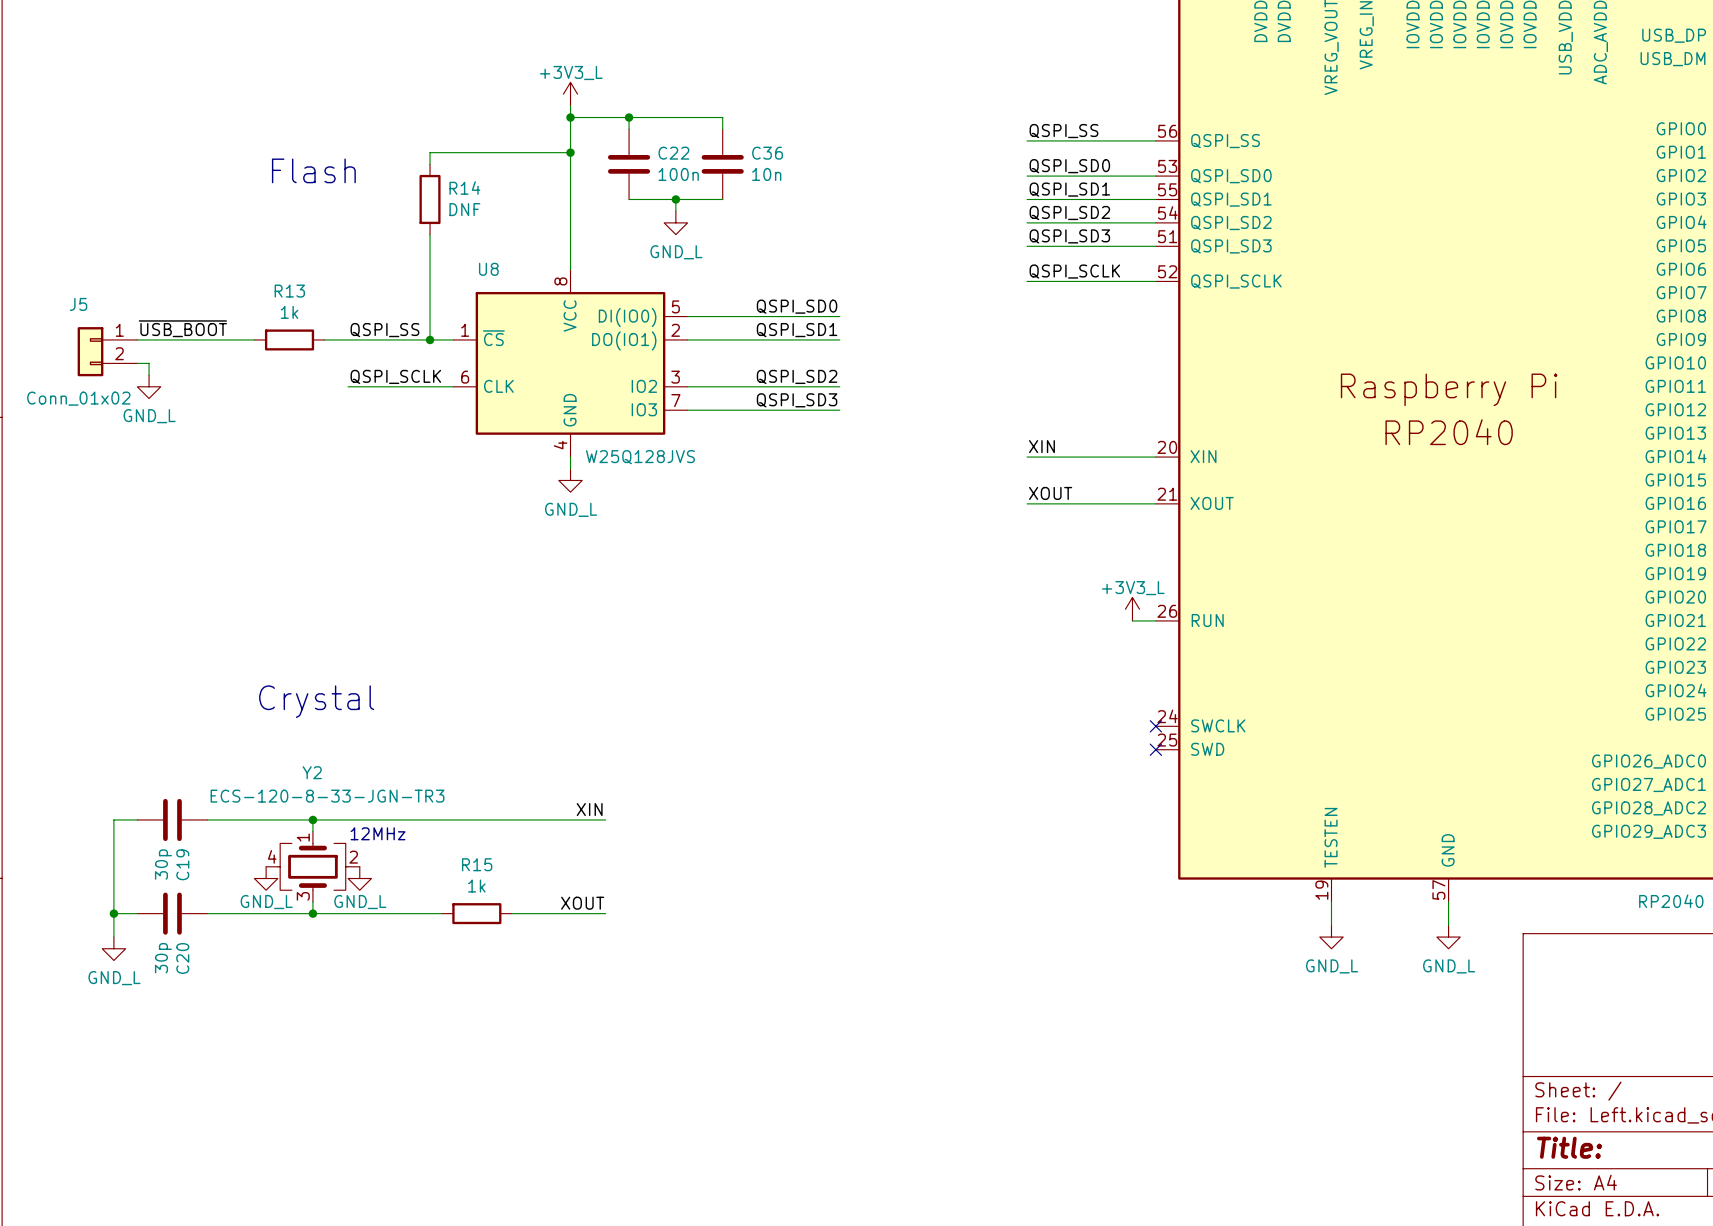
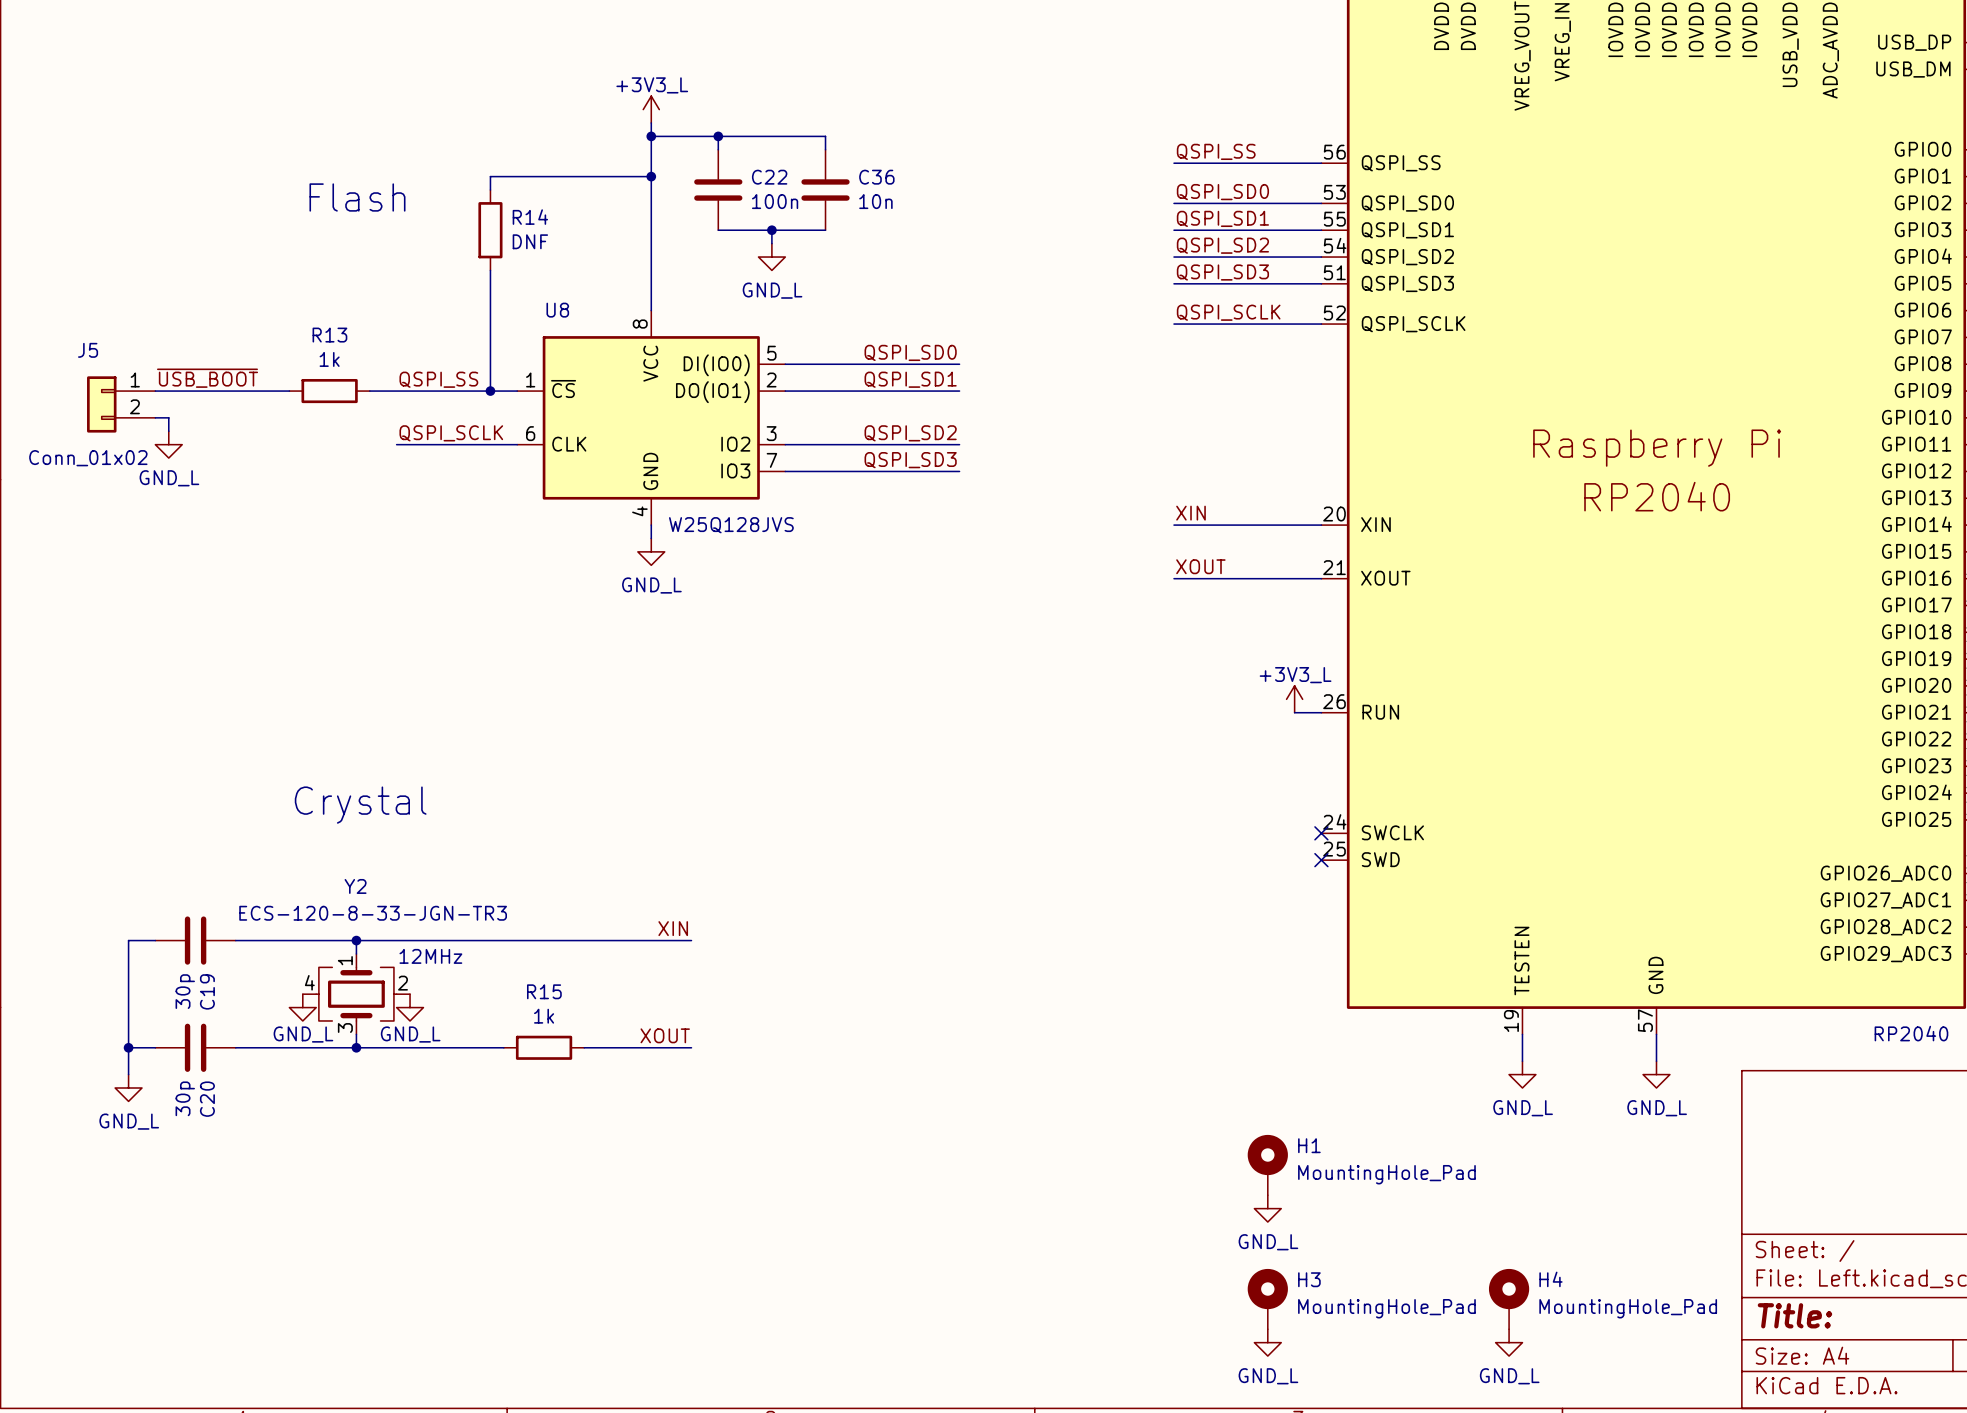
H1: none -> MountingHole_Pad (1267, 1165)
power symbol: none -> GND_L (1267, 1208)
H3: none -> MountingHole_Pad (1267, 1299)
H4: none -> MountingHole_Pad (1509, 1299)
power symbol: none -> GND_L (1267, 1342)
power symbol: none -> GND_L (1509, 1342)

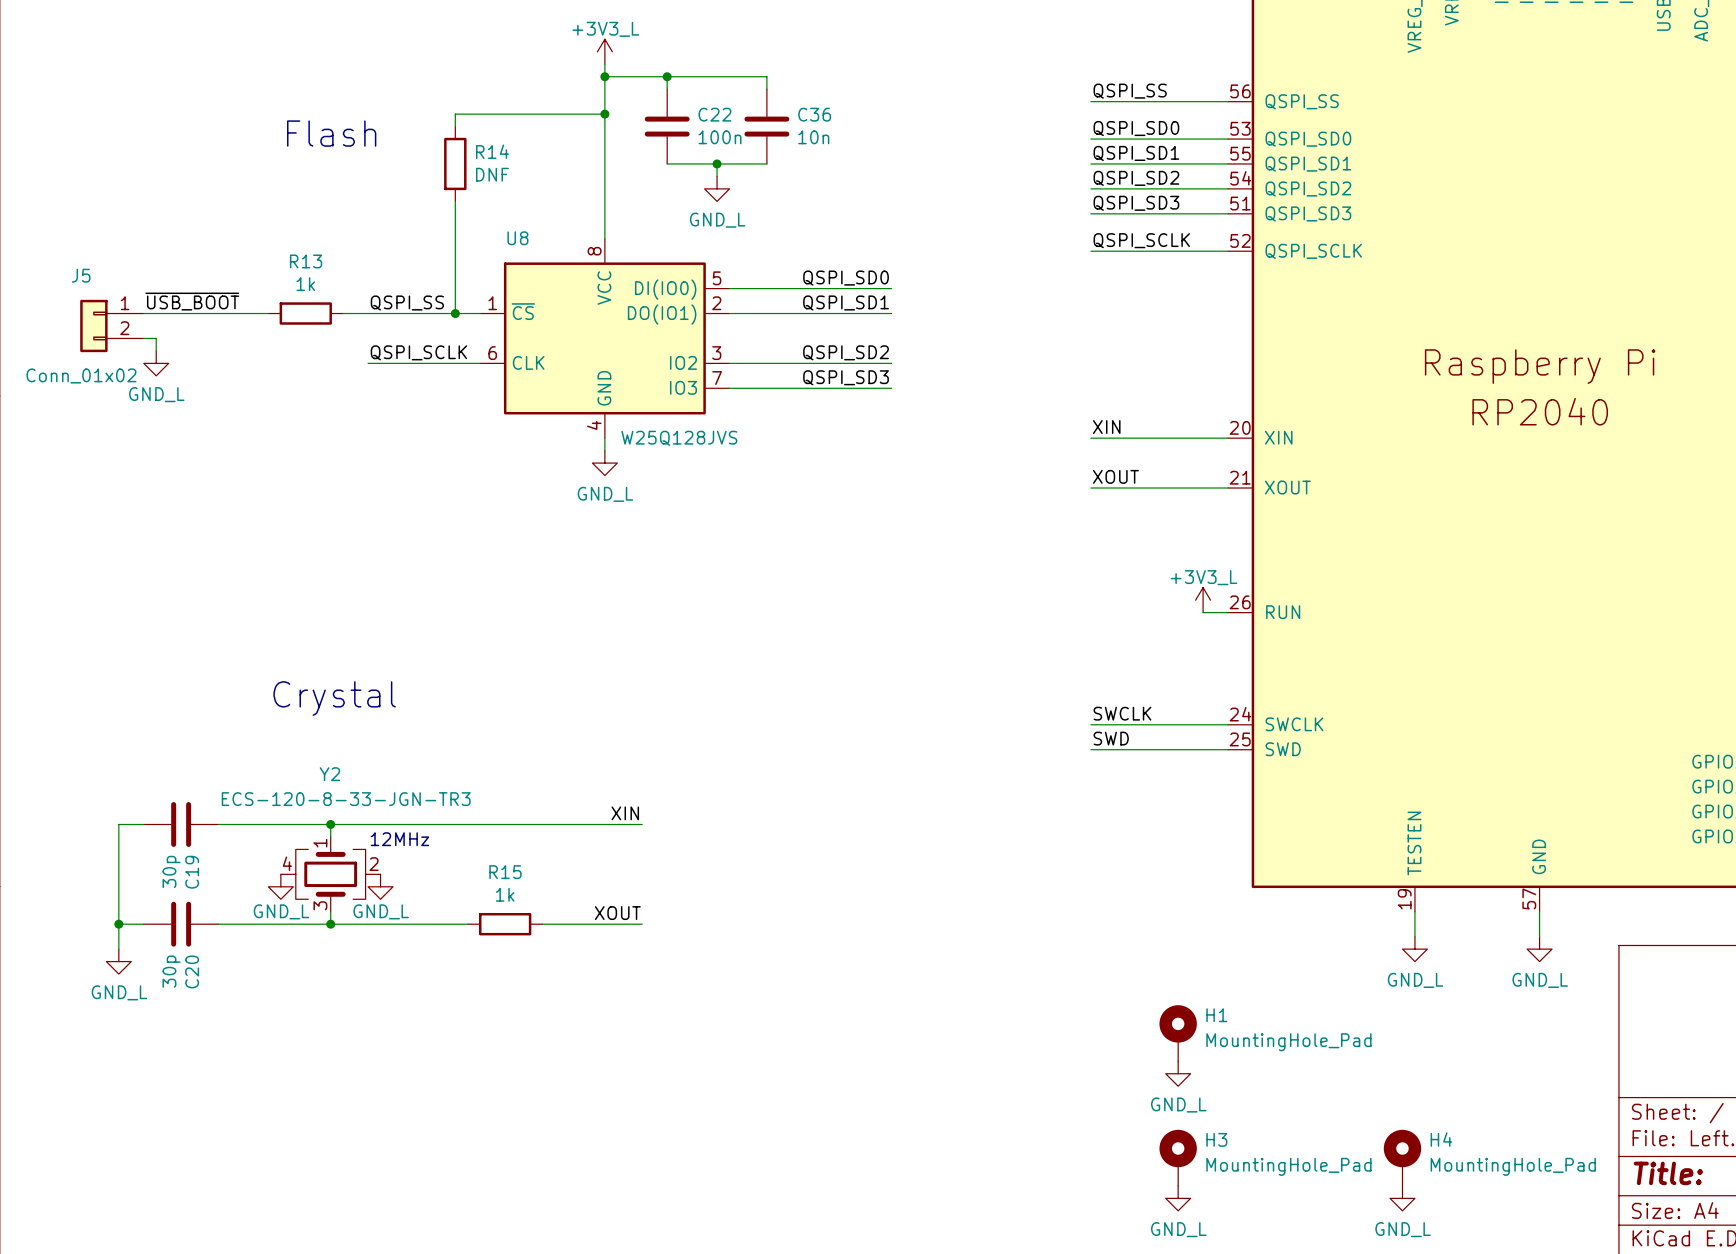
label: none -> SWCLK (1122, 713)
wire: none -> (1090, 724) (1228, 724)
no-connect mark: (1321, 833) -> none
label: none -> SWD (1111, 738)
wire: none -> (1090, 749) (1228, 749)
no-connect mark: (1321, 860) -> none

